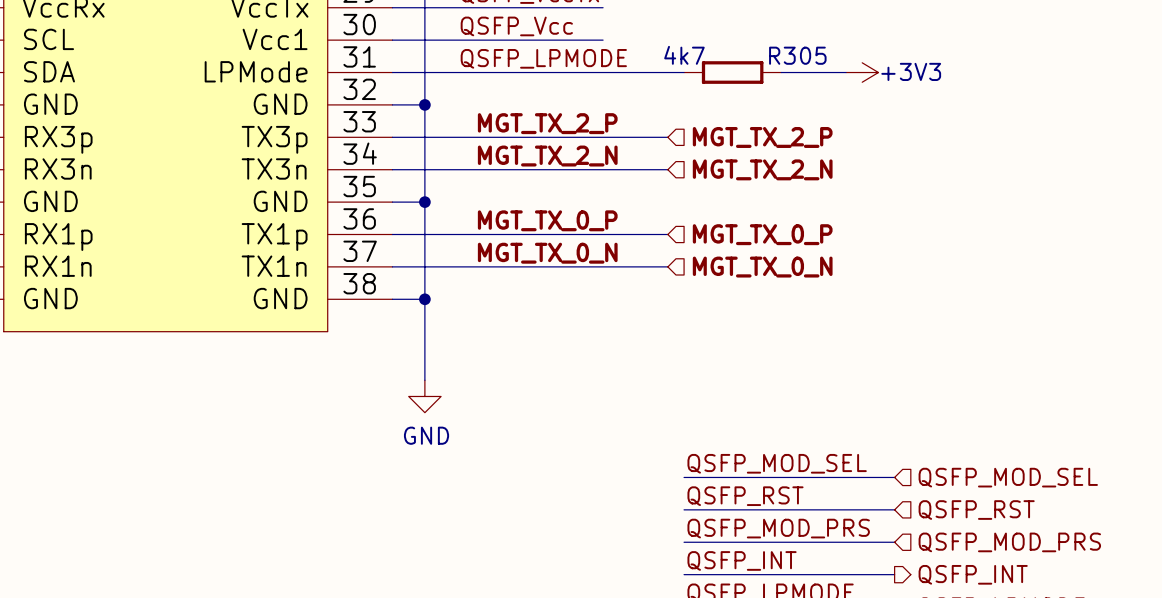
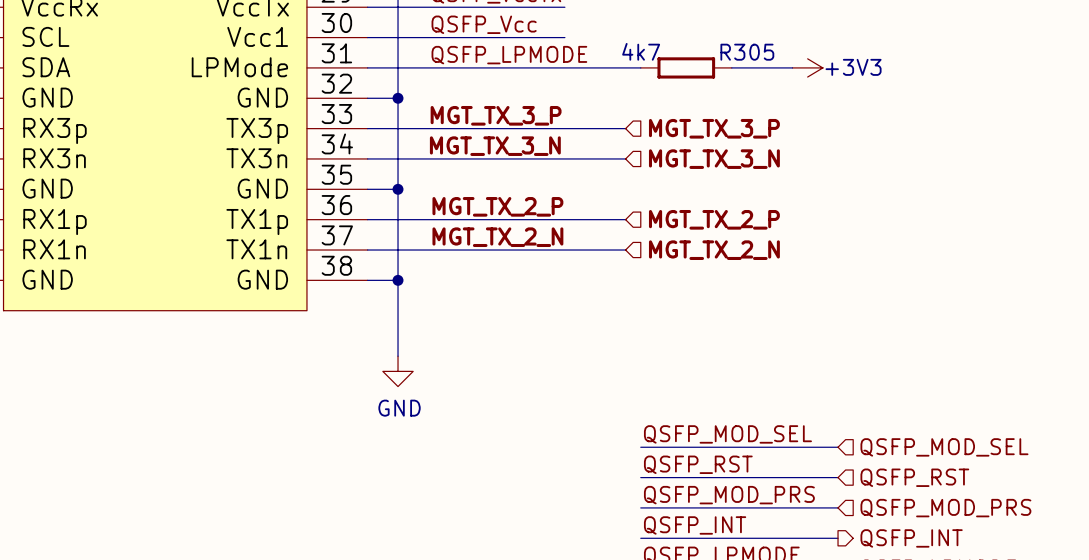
label: none -> MGT_TX_3_P (496, 115)
label position: MGT_TX_2_P (547, 123) -> MGT_TX_2_P (497, 206)
hierarchical label: MGT_TX_2_P (762, 137) -> MGT_TX_3_P (714, 128)
label: none -> MGT_TX_3_N (495, 146)
label position: MGT_TX_2_N (547, 156) -> MGT_TX_2_N (497, 237)
hierarchical label: MGT_TX_2_N (762, 169) -> MGT_TX_3_N (714, 159)
label: MGT_TX_0_P (547, 220) -> none
hierarchical label: MGT_TX_0_P (762, 234) -> MGT_TX_2_P (714, 219)
label: MGT_TX_0_N (547, 253) -> none
hierarchical label: MGT_TX_0_N (762, 267) -> MGT_TX_2_N (714, 250)

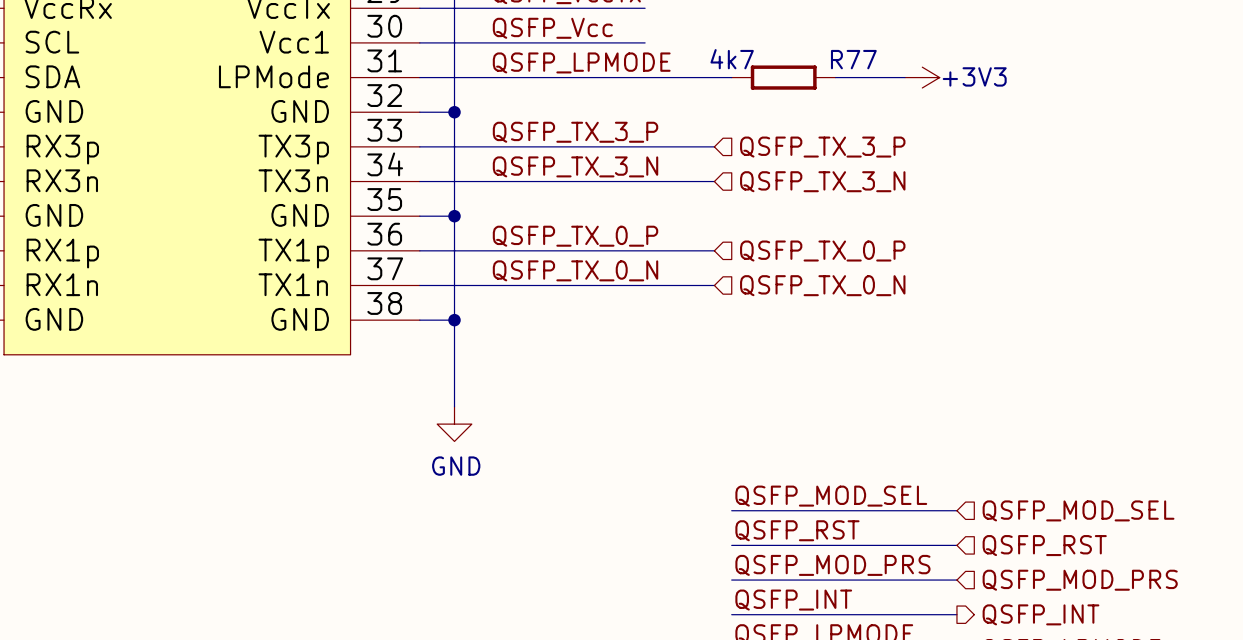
R305 name: R305 (747, 52) -> R77 (853, 59)
label: MGT_TX_3_P (496, 115) -> QSFP_TX_3_P (575, 132)
hierarchical label: MGT_TX_3_P (714, 128) -> QSFP_TX_3_P (822, 147)
label: MGT_TX_3_N (495, 146) -> QSFP_TX_3_N (575, 166)
hierarchical label: MGT_TX_3_N (714, 159) -> QSFP_TX_3_N (822, 181)
label: MGT_TX_2_P (497, 206) -> QSFP_TX_0_P (575, 236)
hierarchical label: MGT_TX_2_P (714, 219) -> QSFP_TX_0_P (822, 251)
label: MGT_TX_2_N (497, 237) -> QSFP_TX_0_N (575, 270)
hierarchical label: MGT_TX_2_N (714, 250) -> QSFP_TX_0_N (822, 285)

